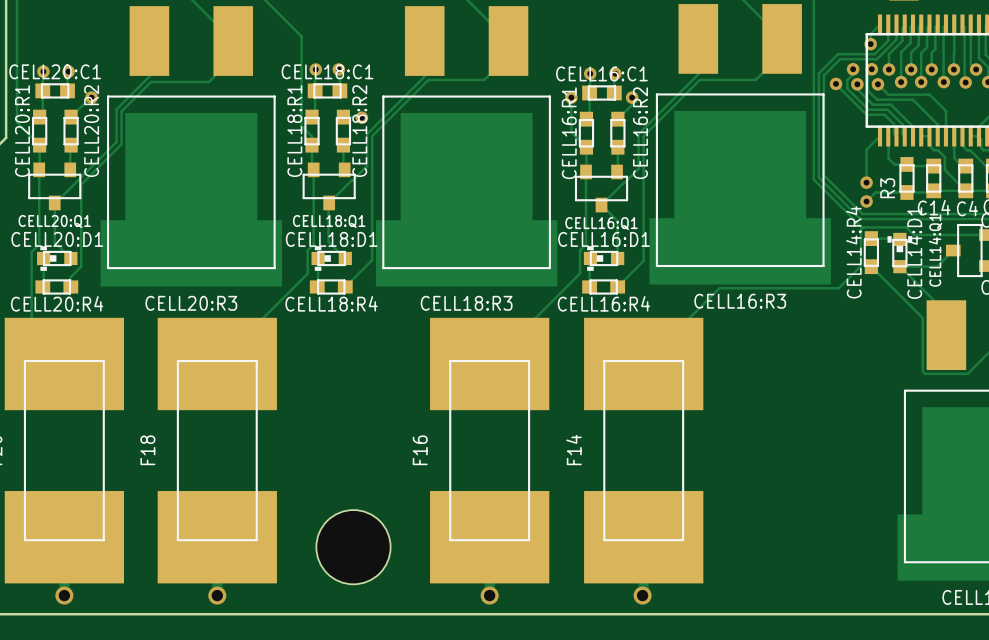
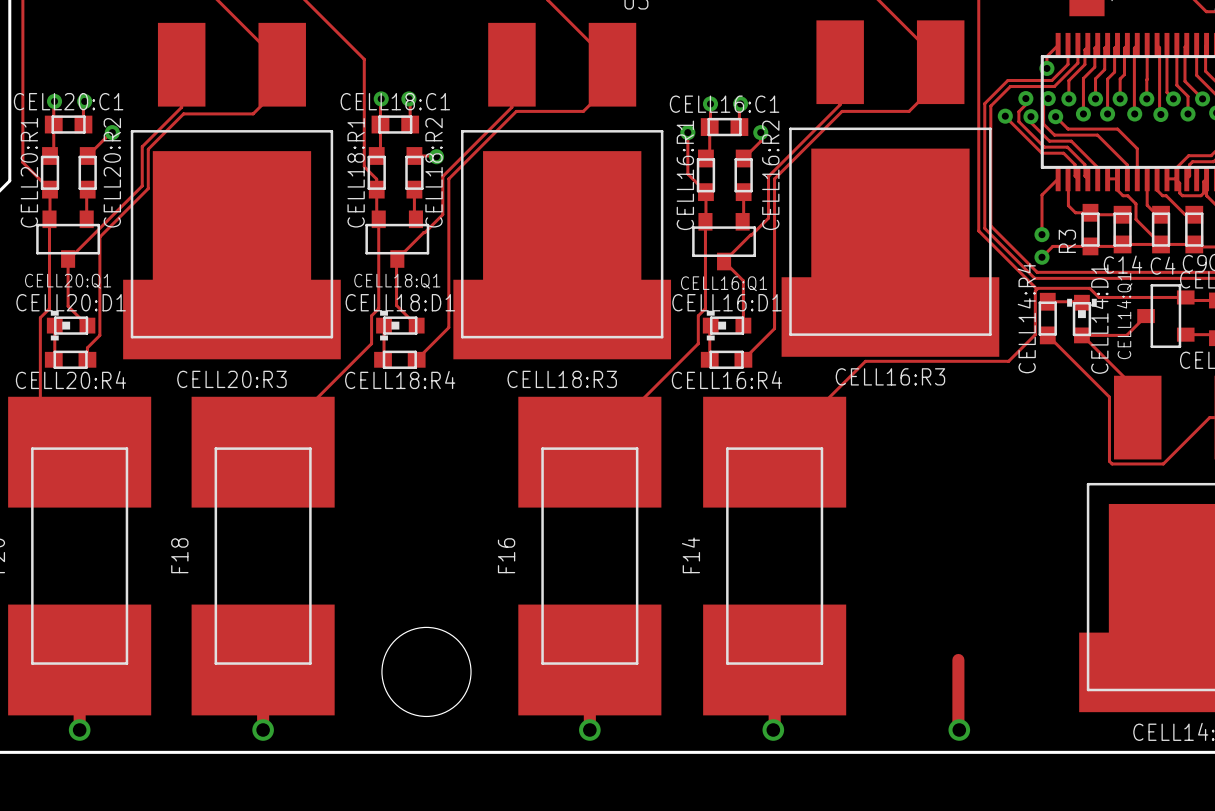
track: none -> (958, 659) (959, 729)
via: none -> (959, 729)

